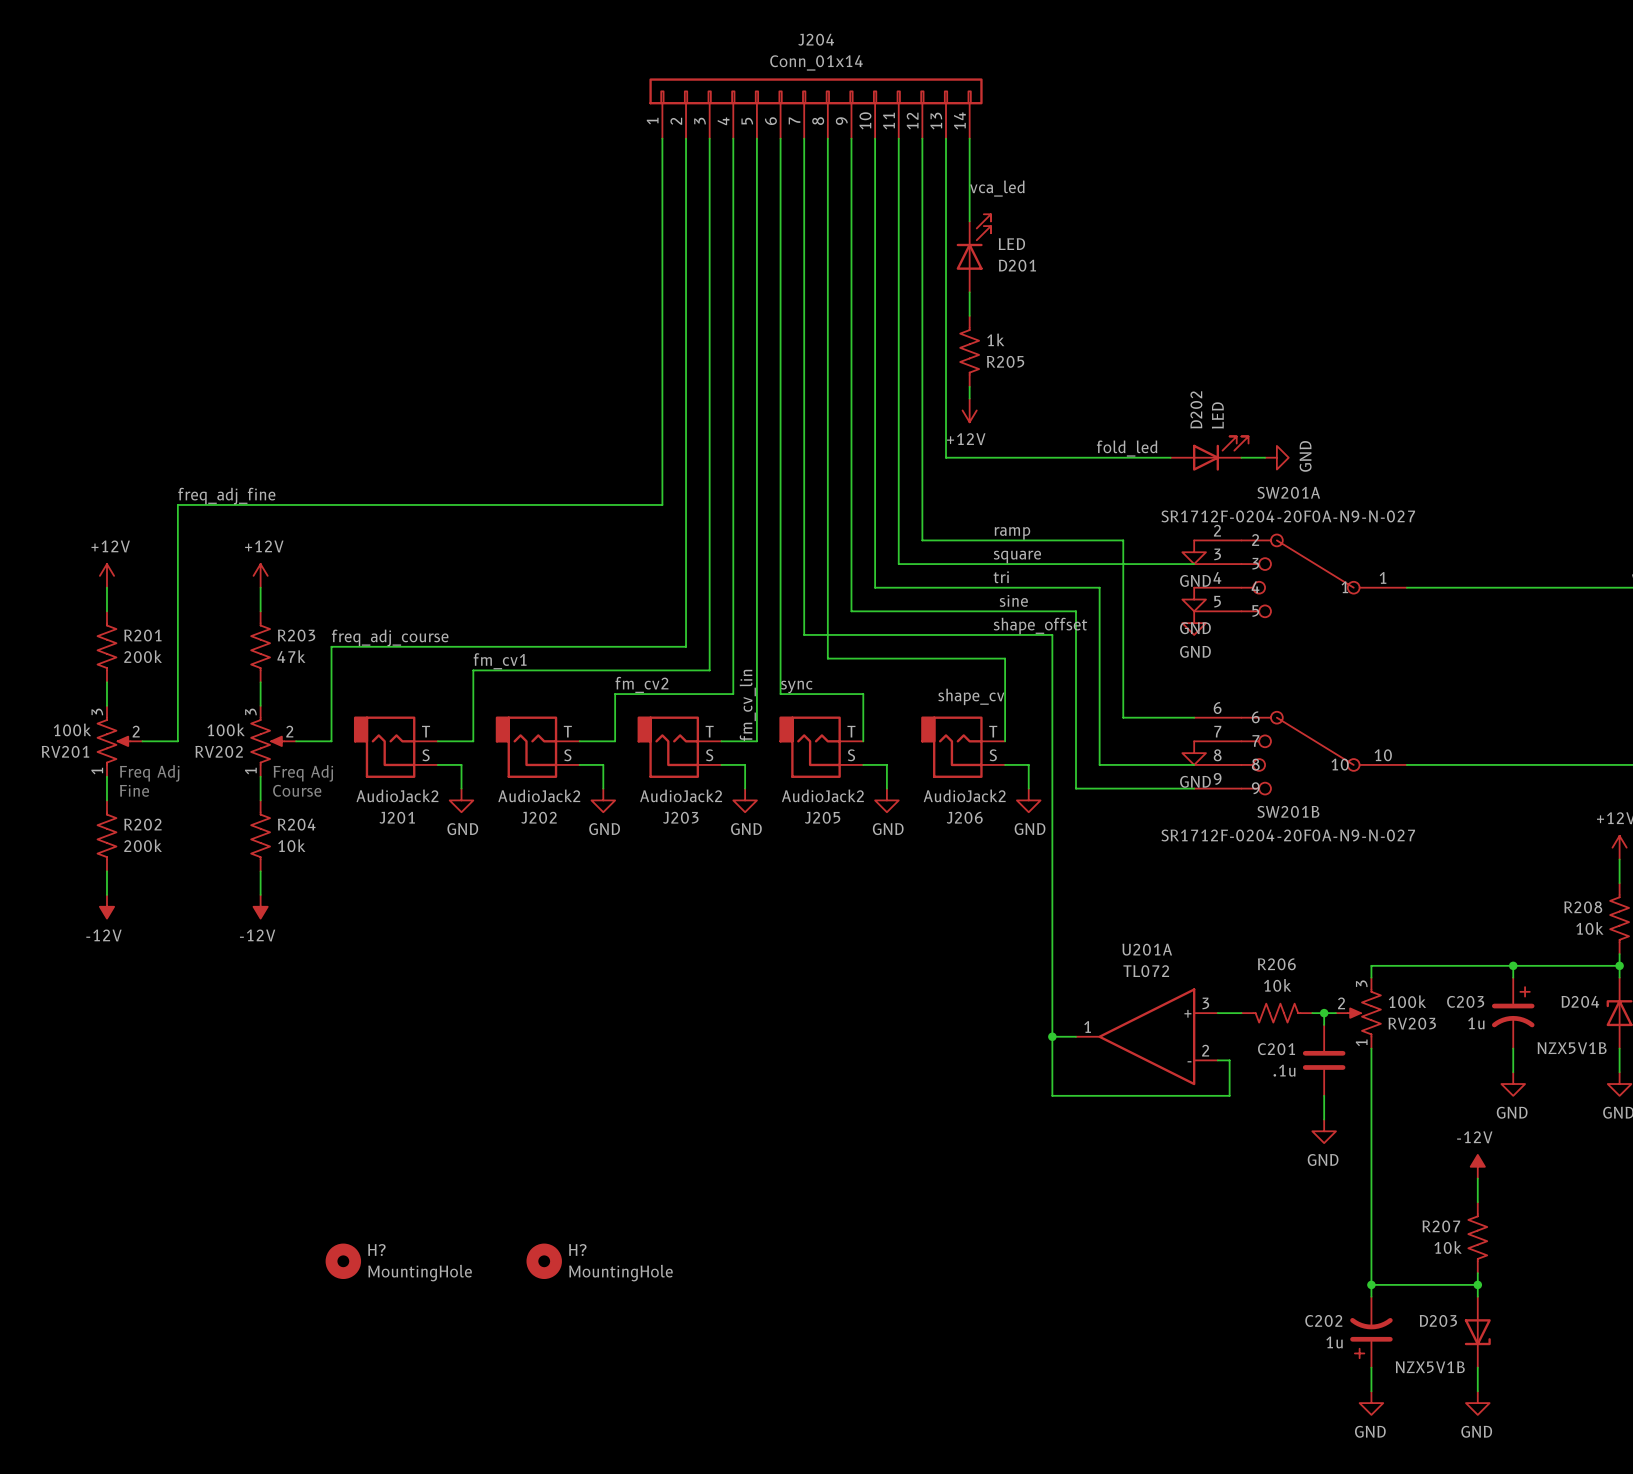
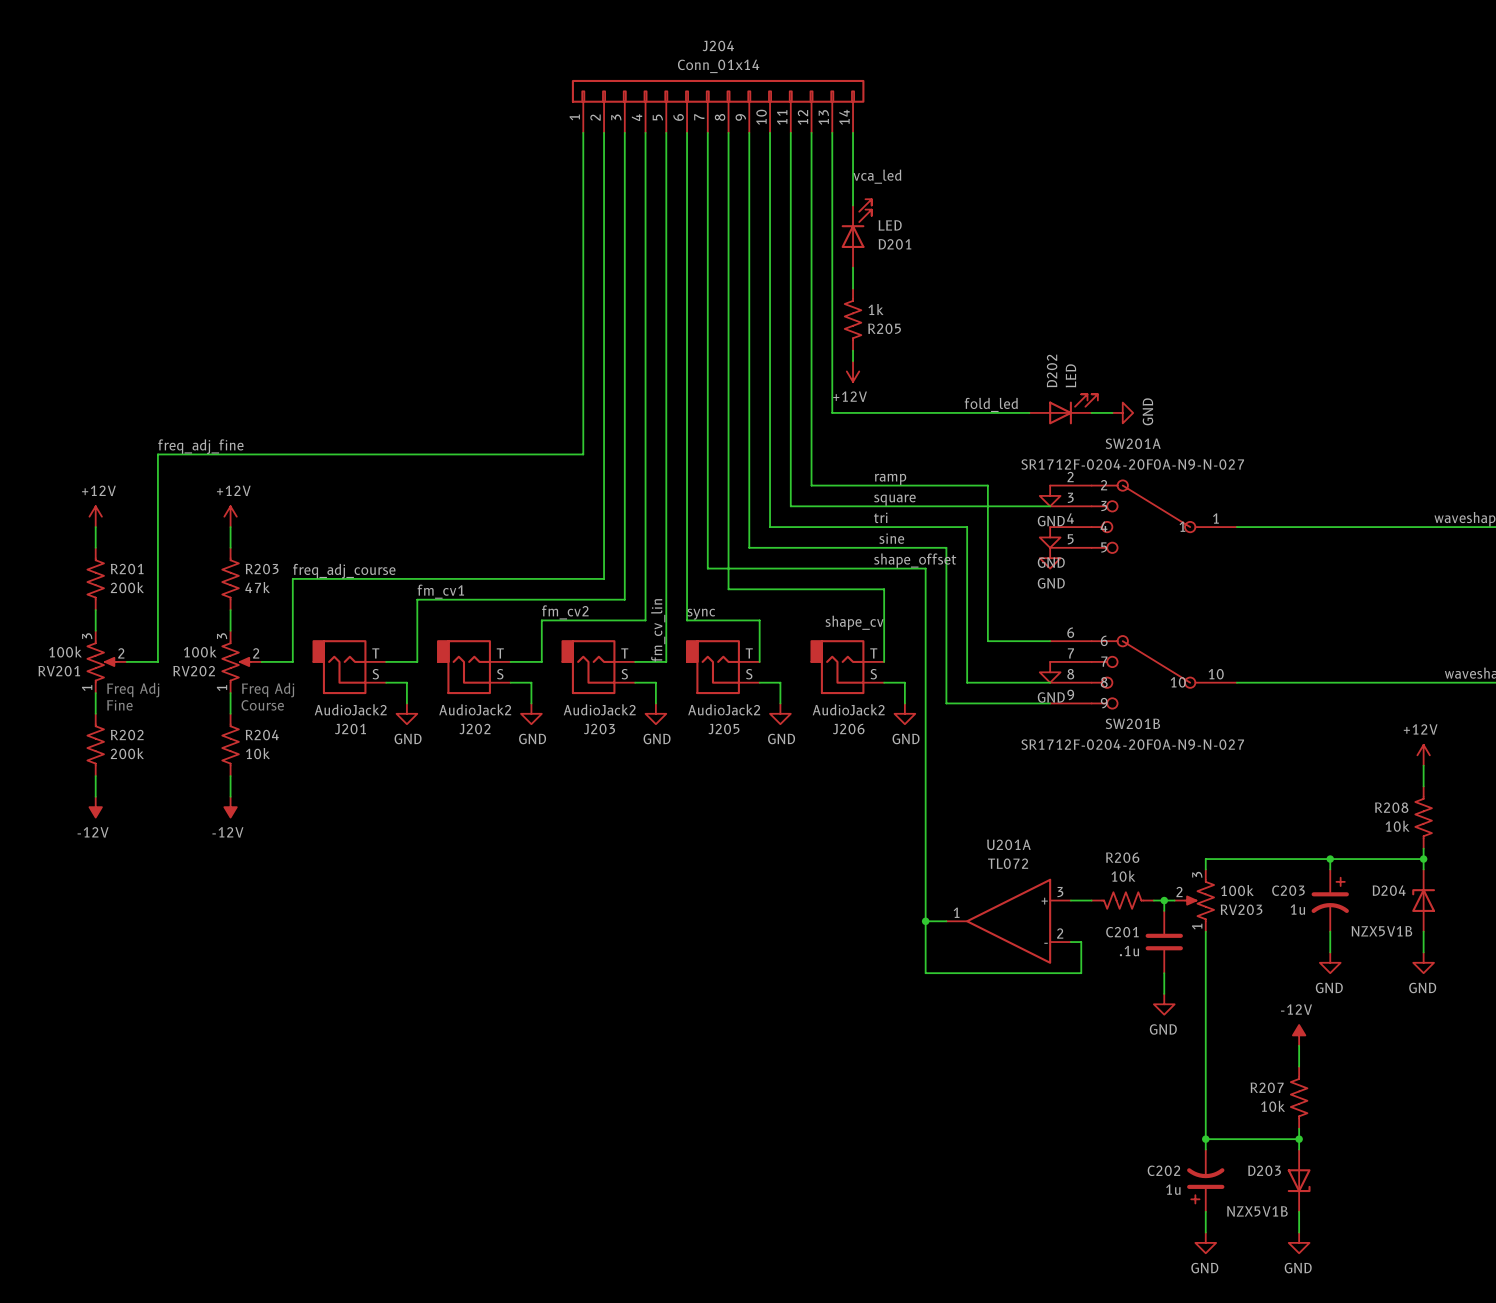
H?: MountingHole (343, 1261) -> none
H?: MountingHole (544, 1261) -> none

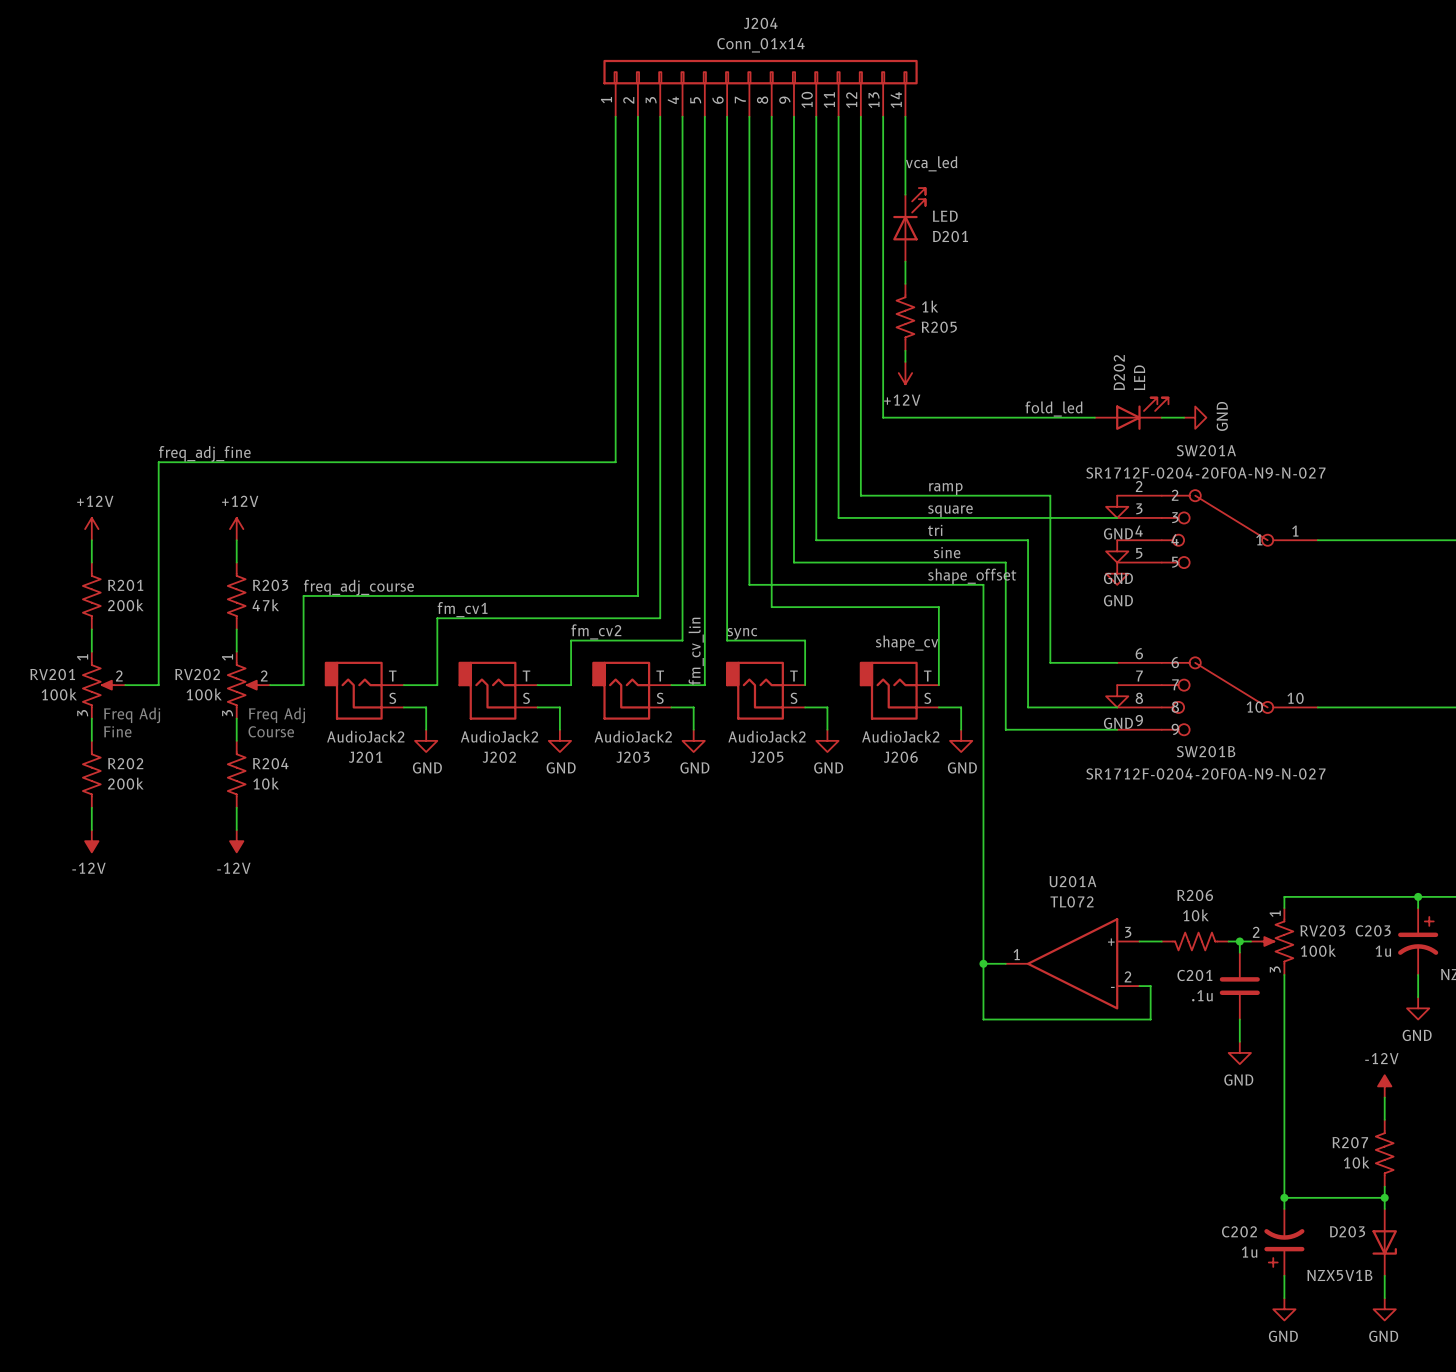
RV201 flip: as is (101, 661) -> up-down (98, 685)
RV202 flip: as is (236, 661) -> up-down (243, 685)
RV203 flip: as is (1199, 900) -> up-down (1277, 941)

